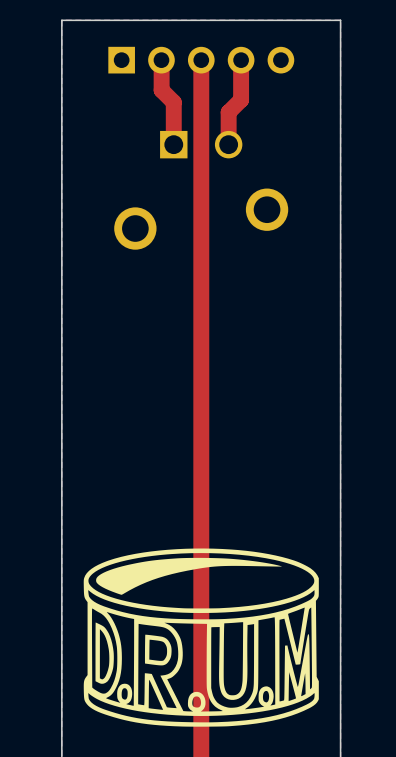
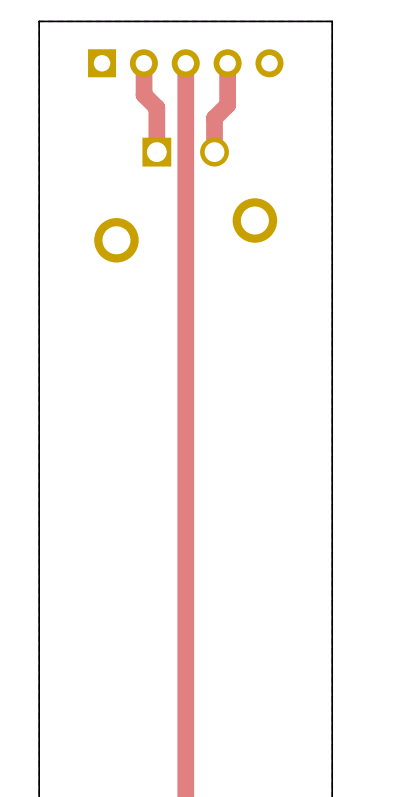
drawing: [83, 548, 319, 727] -> none

